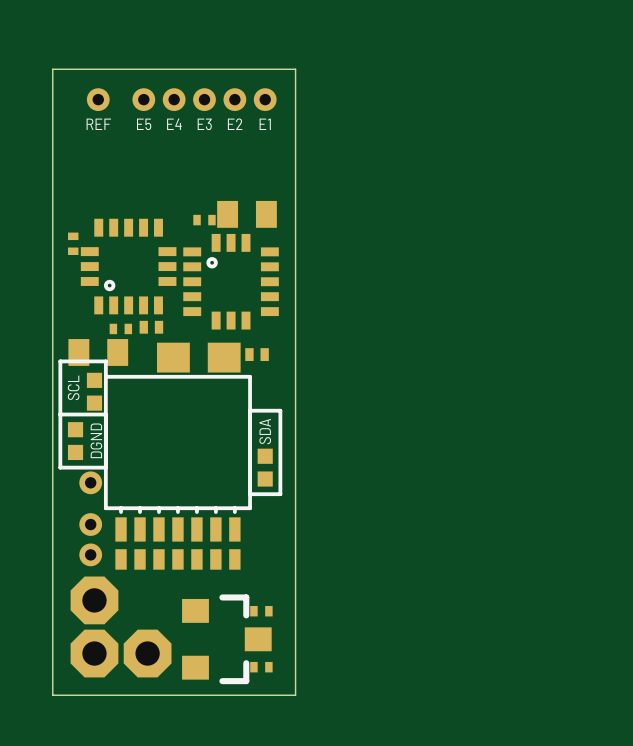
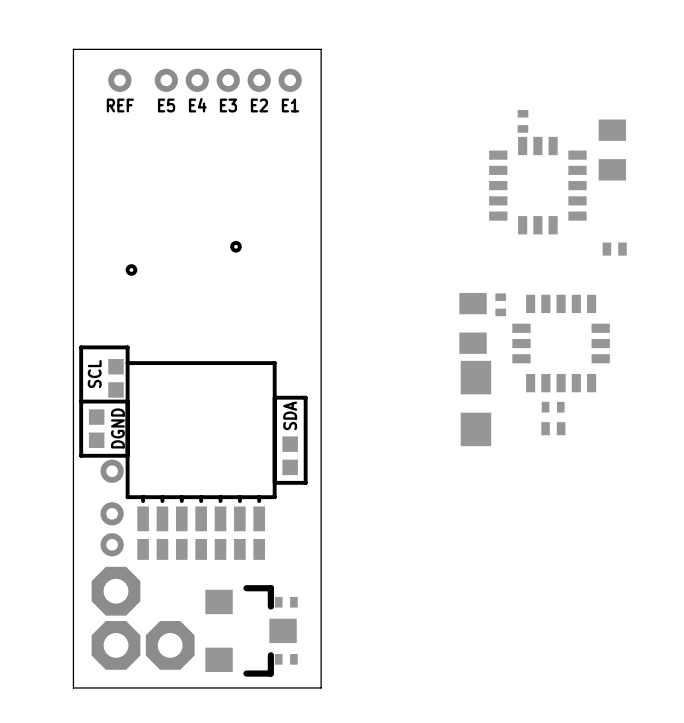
part: none -> (522, 121)
part: none -> (612, 150)
part: none -> (537, 185)
part: (247, 214) -> none
part: (204, 220) -> none
part: (73, 243) -> none
part: none -> (614, 249)
part: (128, 266) -> none
part: (231, 281) -> none
part: none -> (500, 304)
part: (151, 327) -> none
part: (120, 328) -> none
part: none -> (473, 323)
part: (98, 352) -> none
part: (257, 354) -> none
part rotation: 0° (198, 357) -> 90° clockwise (475, 403)
part position: (198, 357) -> (475, 403)
part: none -> (561, 343)
part: none -> (553, 407)
part: none -> (553, 428)

